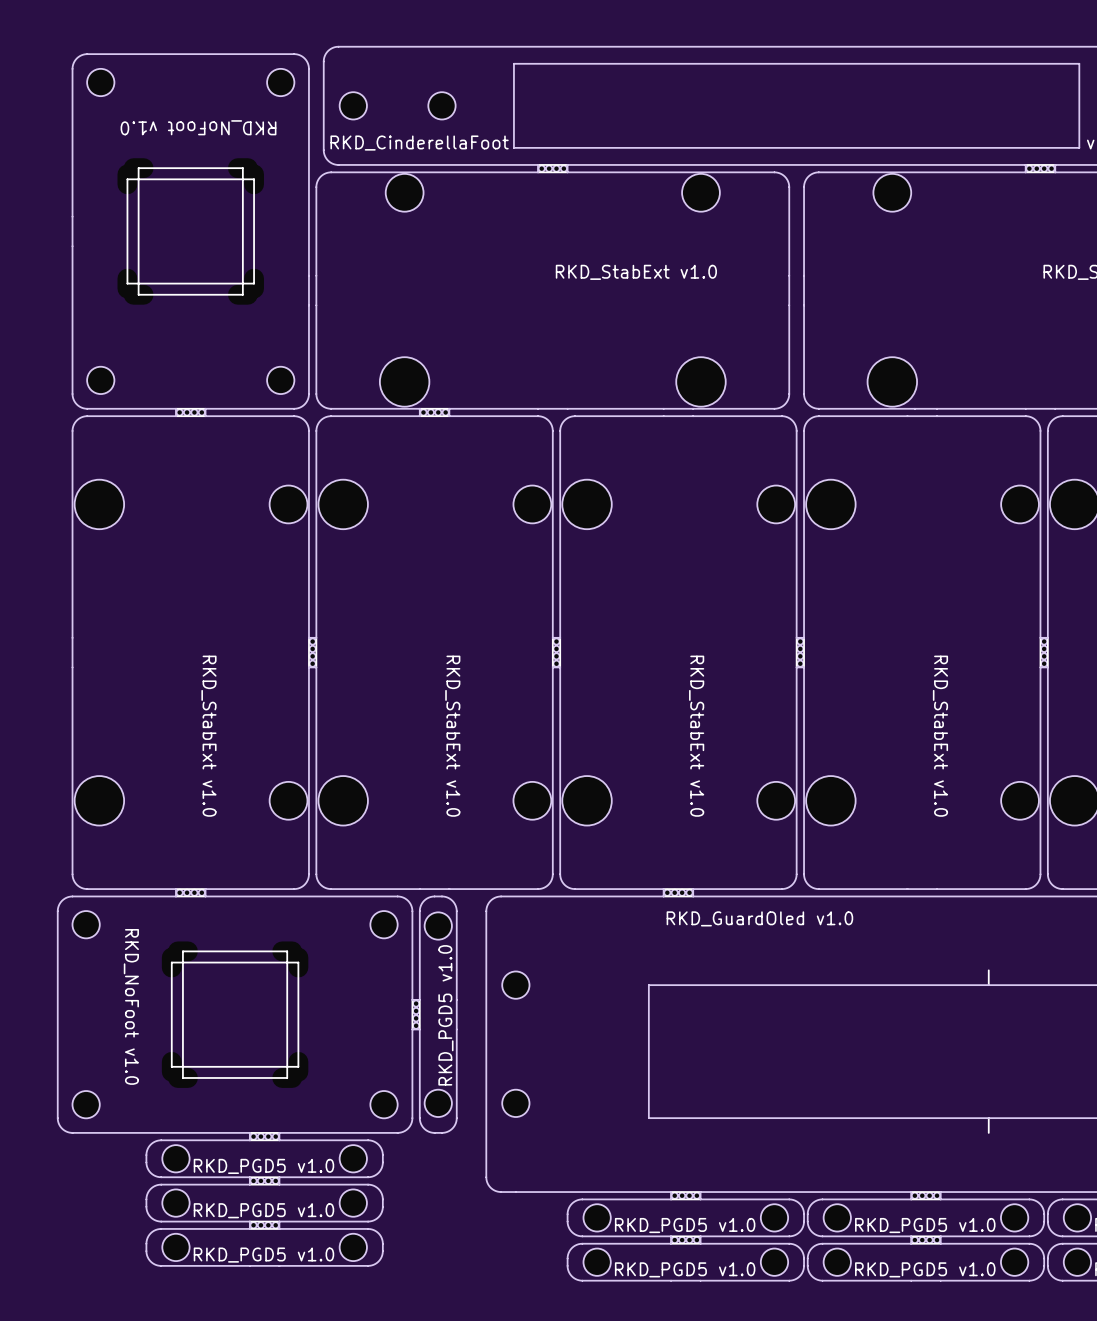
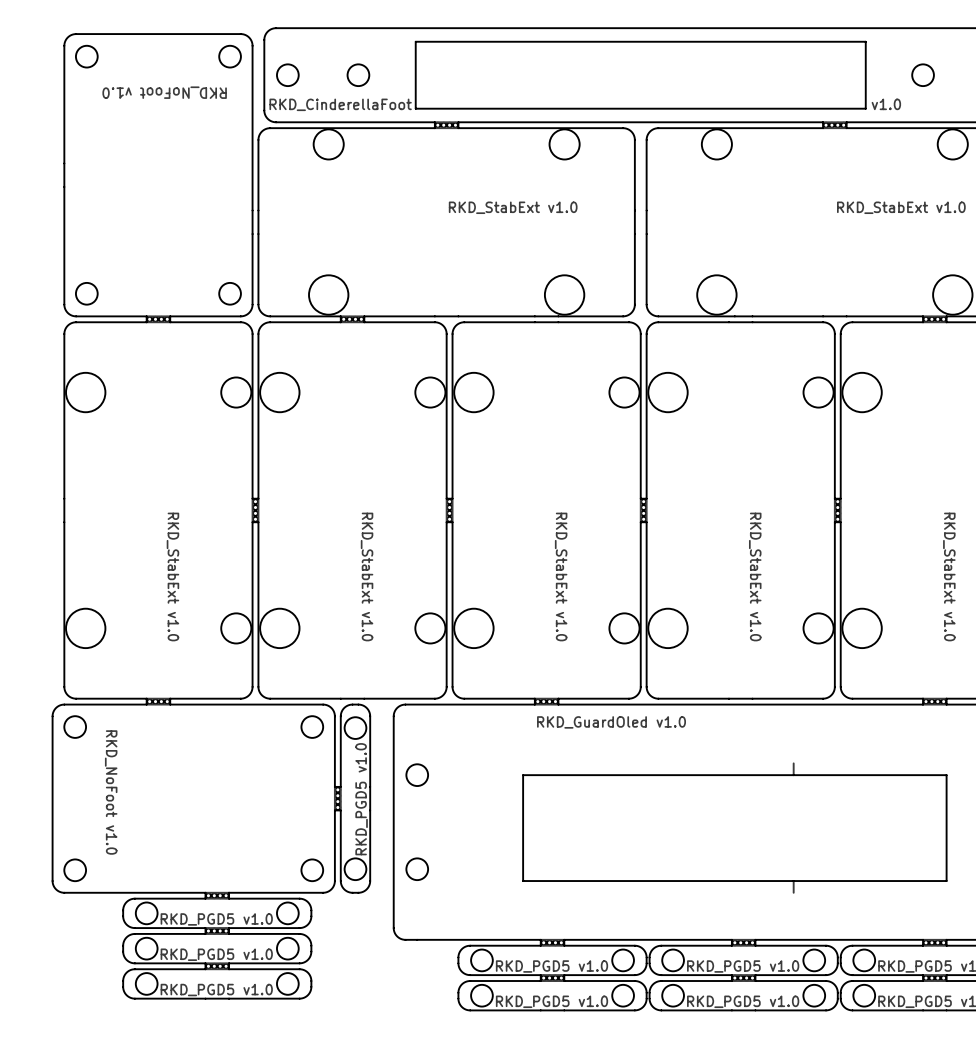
part: (190, 231) -> none
part: (190, 231) -> none
part: (235, 1014) -> none
part: (235, 1014) -> none

